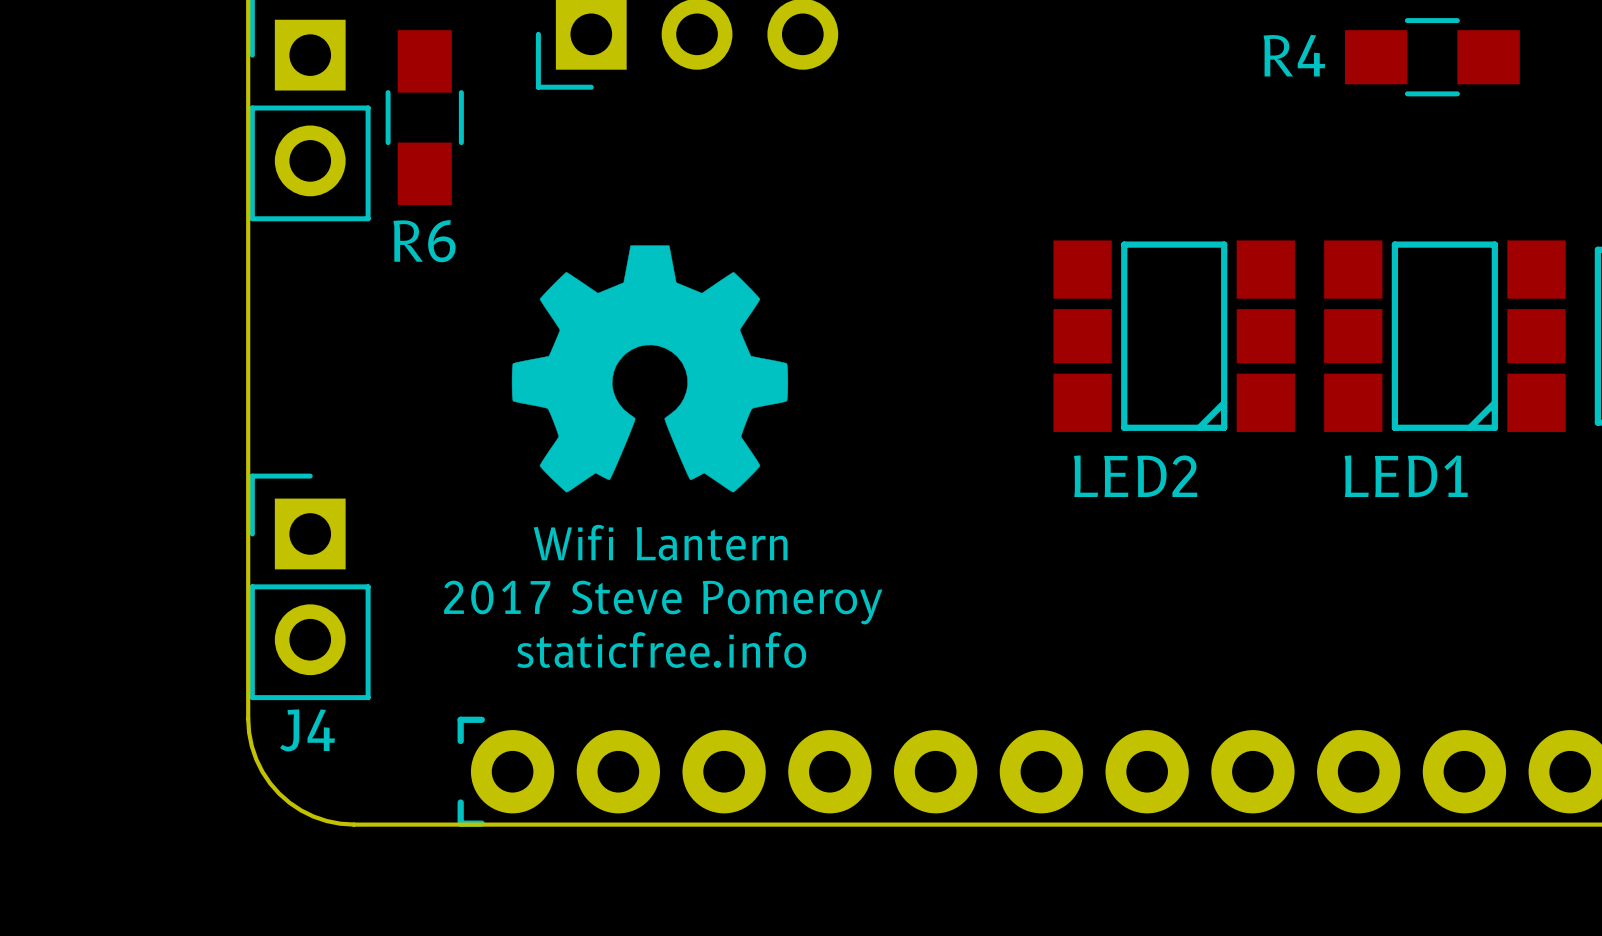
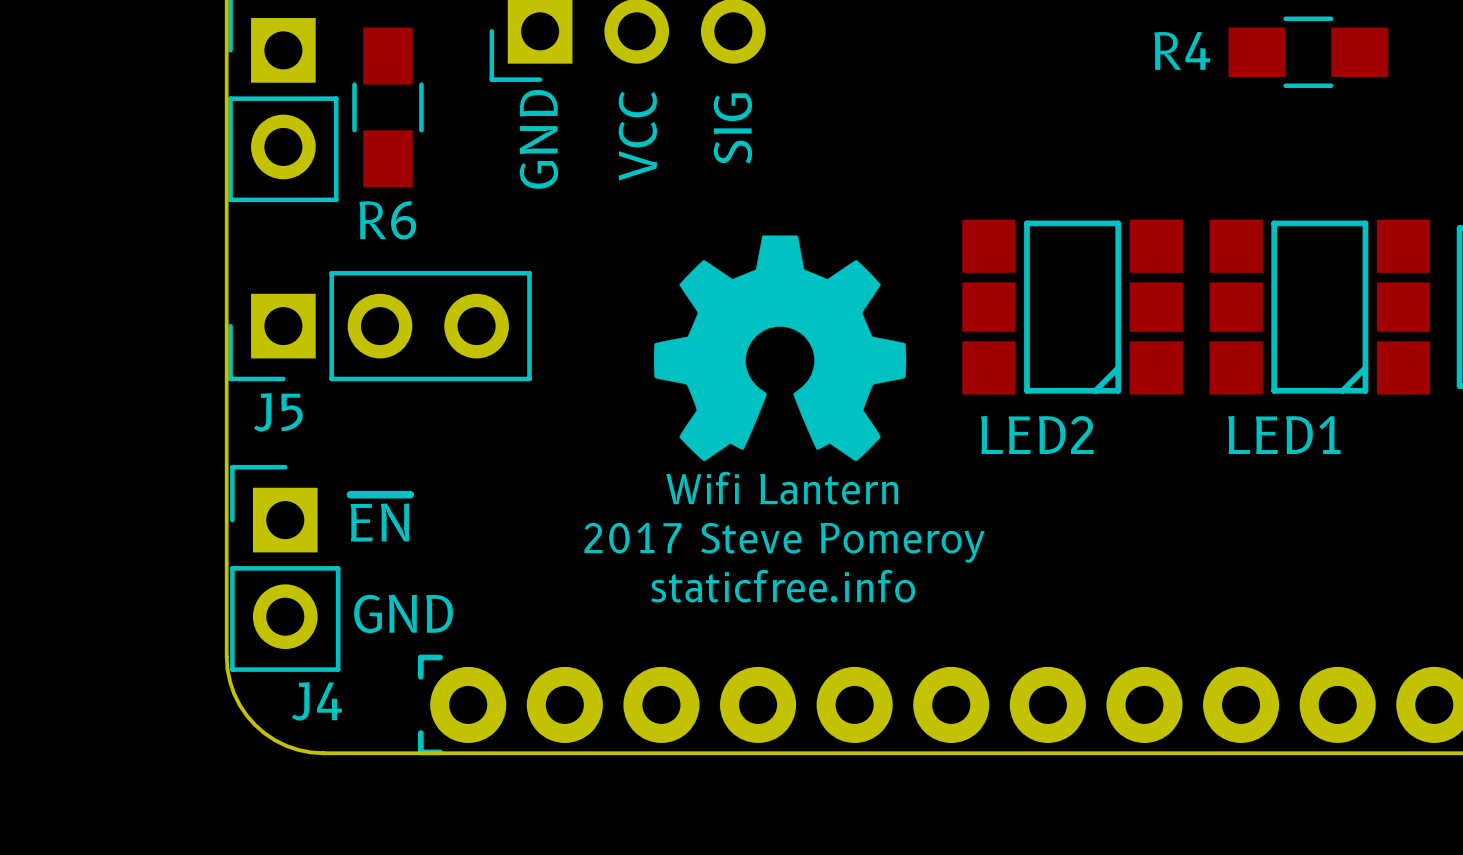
text: none -> SIG (732, 128)
text: none -> VCC (637, 136)
text: none -> GND (538, 139)
J5: none -> (379, 326)
drawing position: (649, 368) -> (780, 348)
text position: Wifi Lantern (660, 542) -> Wifi Lantern (782, 488)
text: none -> ~{EN} (380, 518)
J4 position: (310, 586) -> (285, 568)
text position: 2017 Steve Pomeroy (663, 602) -> 2017 Steve Pomeroy (784, 542)
text position: staticfree.info (661, 650) -> staticfree.info (783, 586)
text: none -> GND (403, 613)
J4 name position: J4 (307, 730) -> J4 (317, 701)

